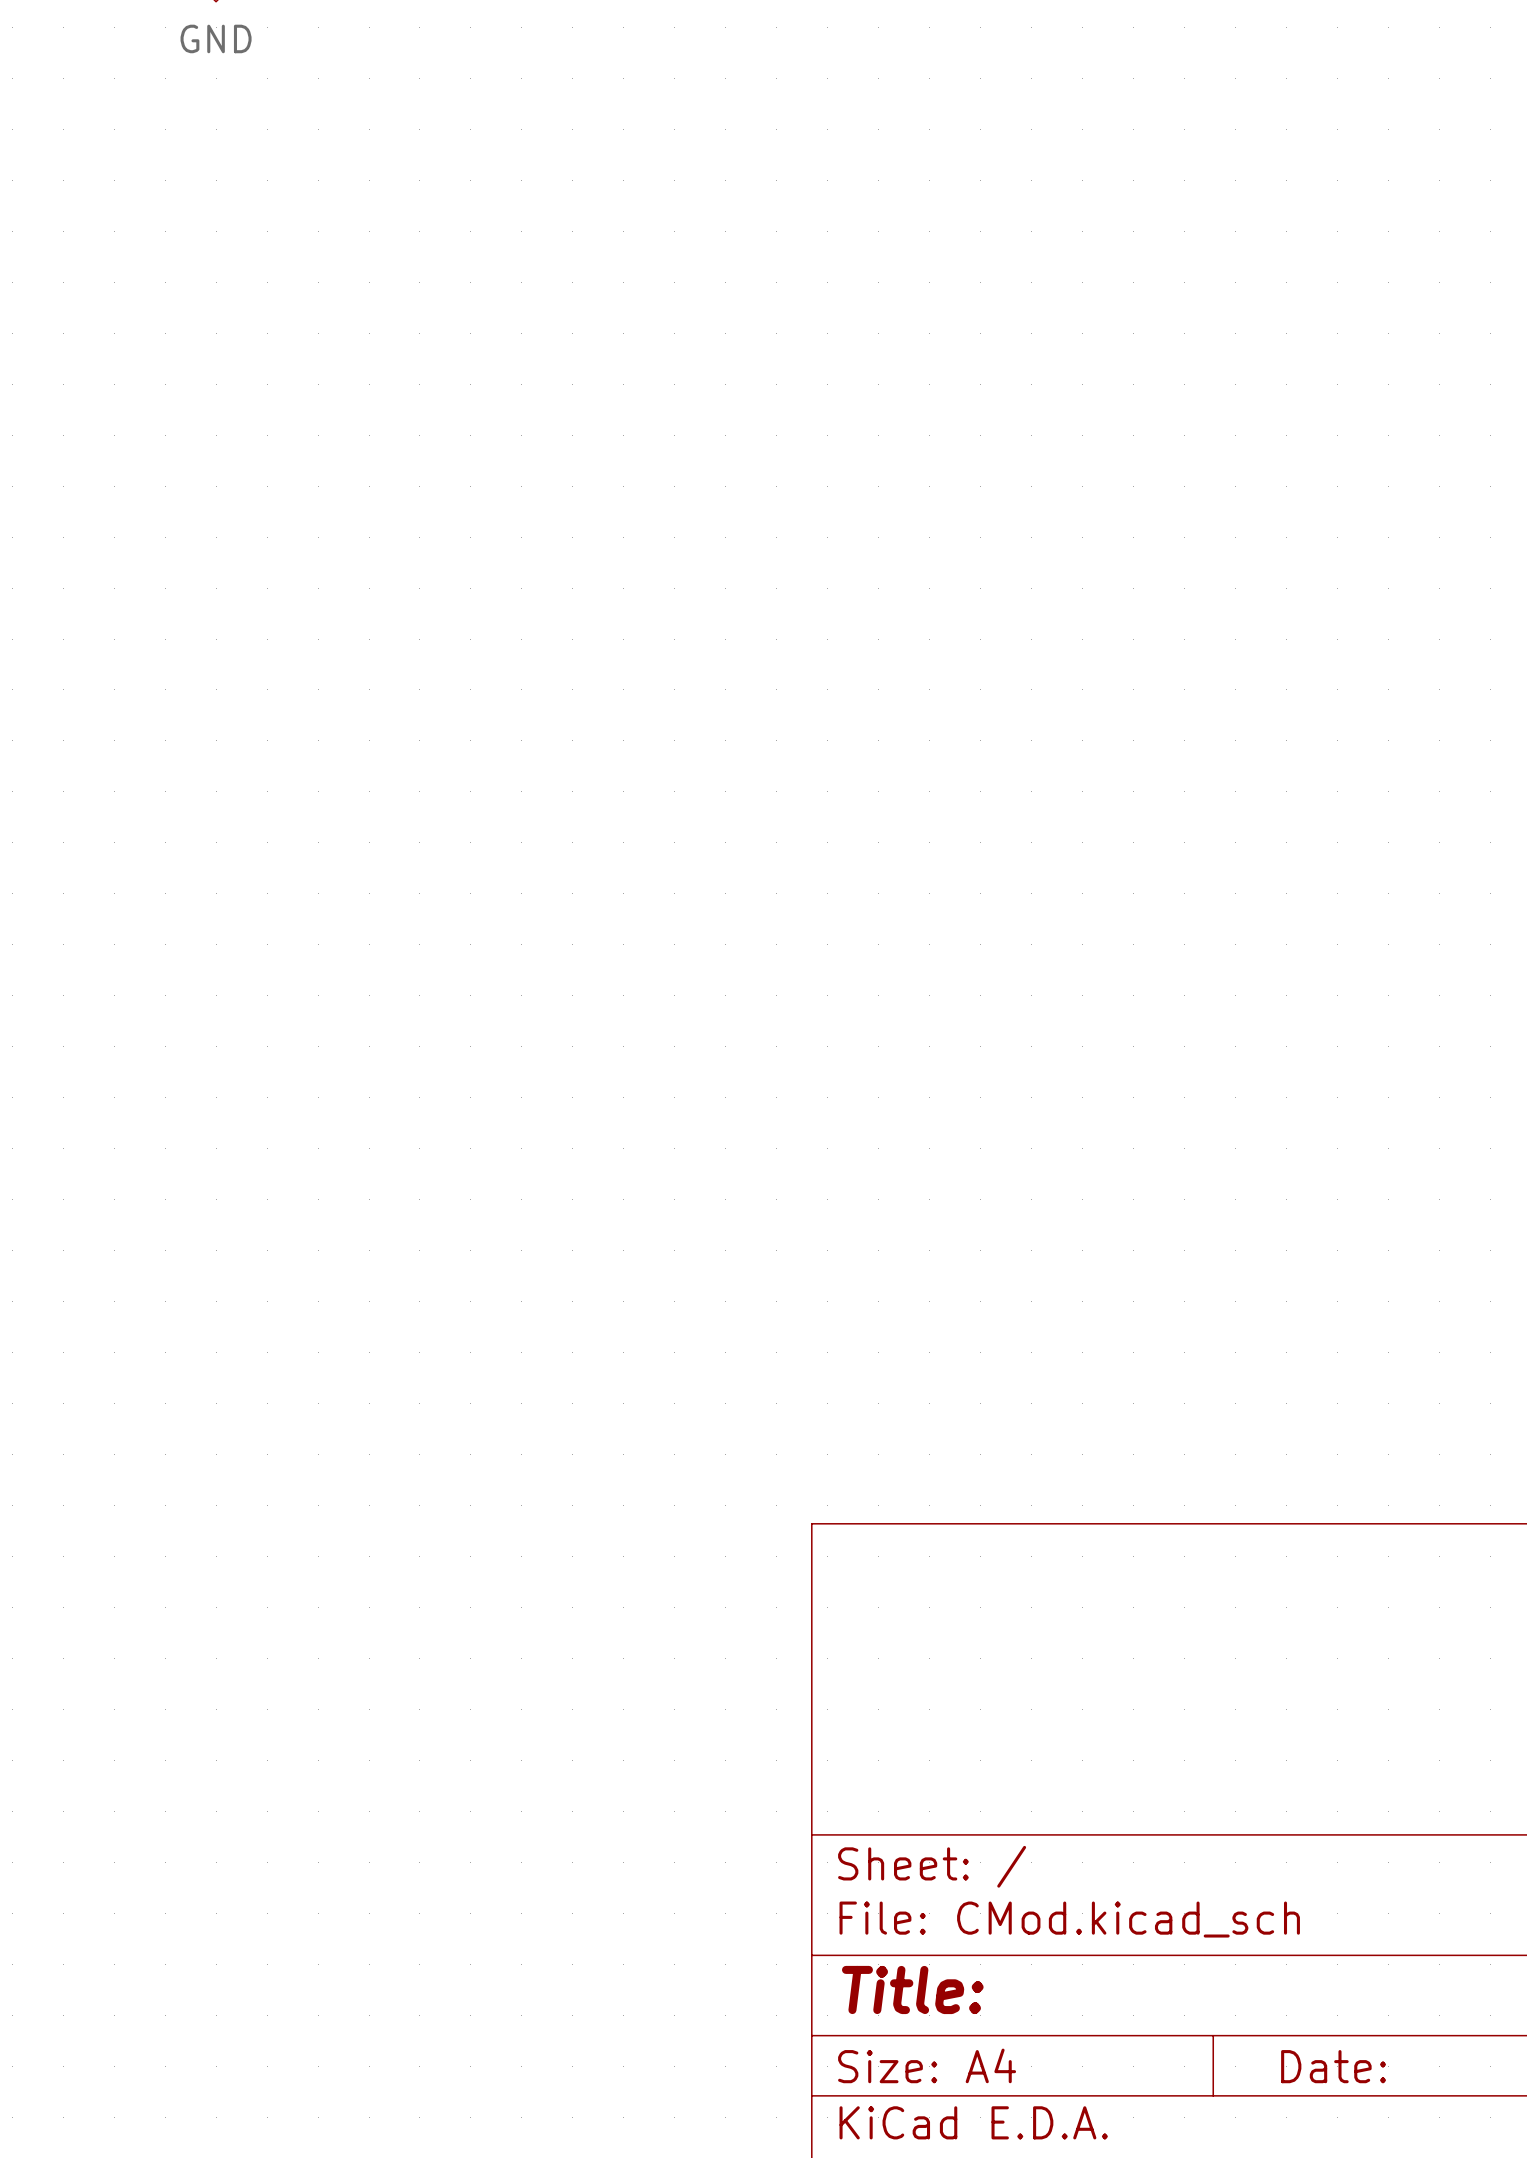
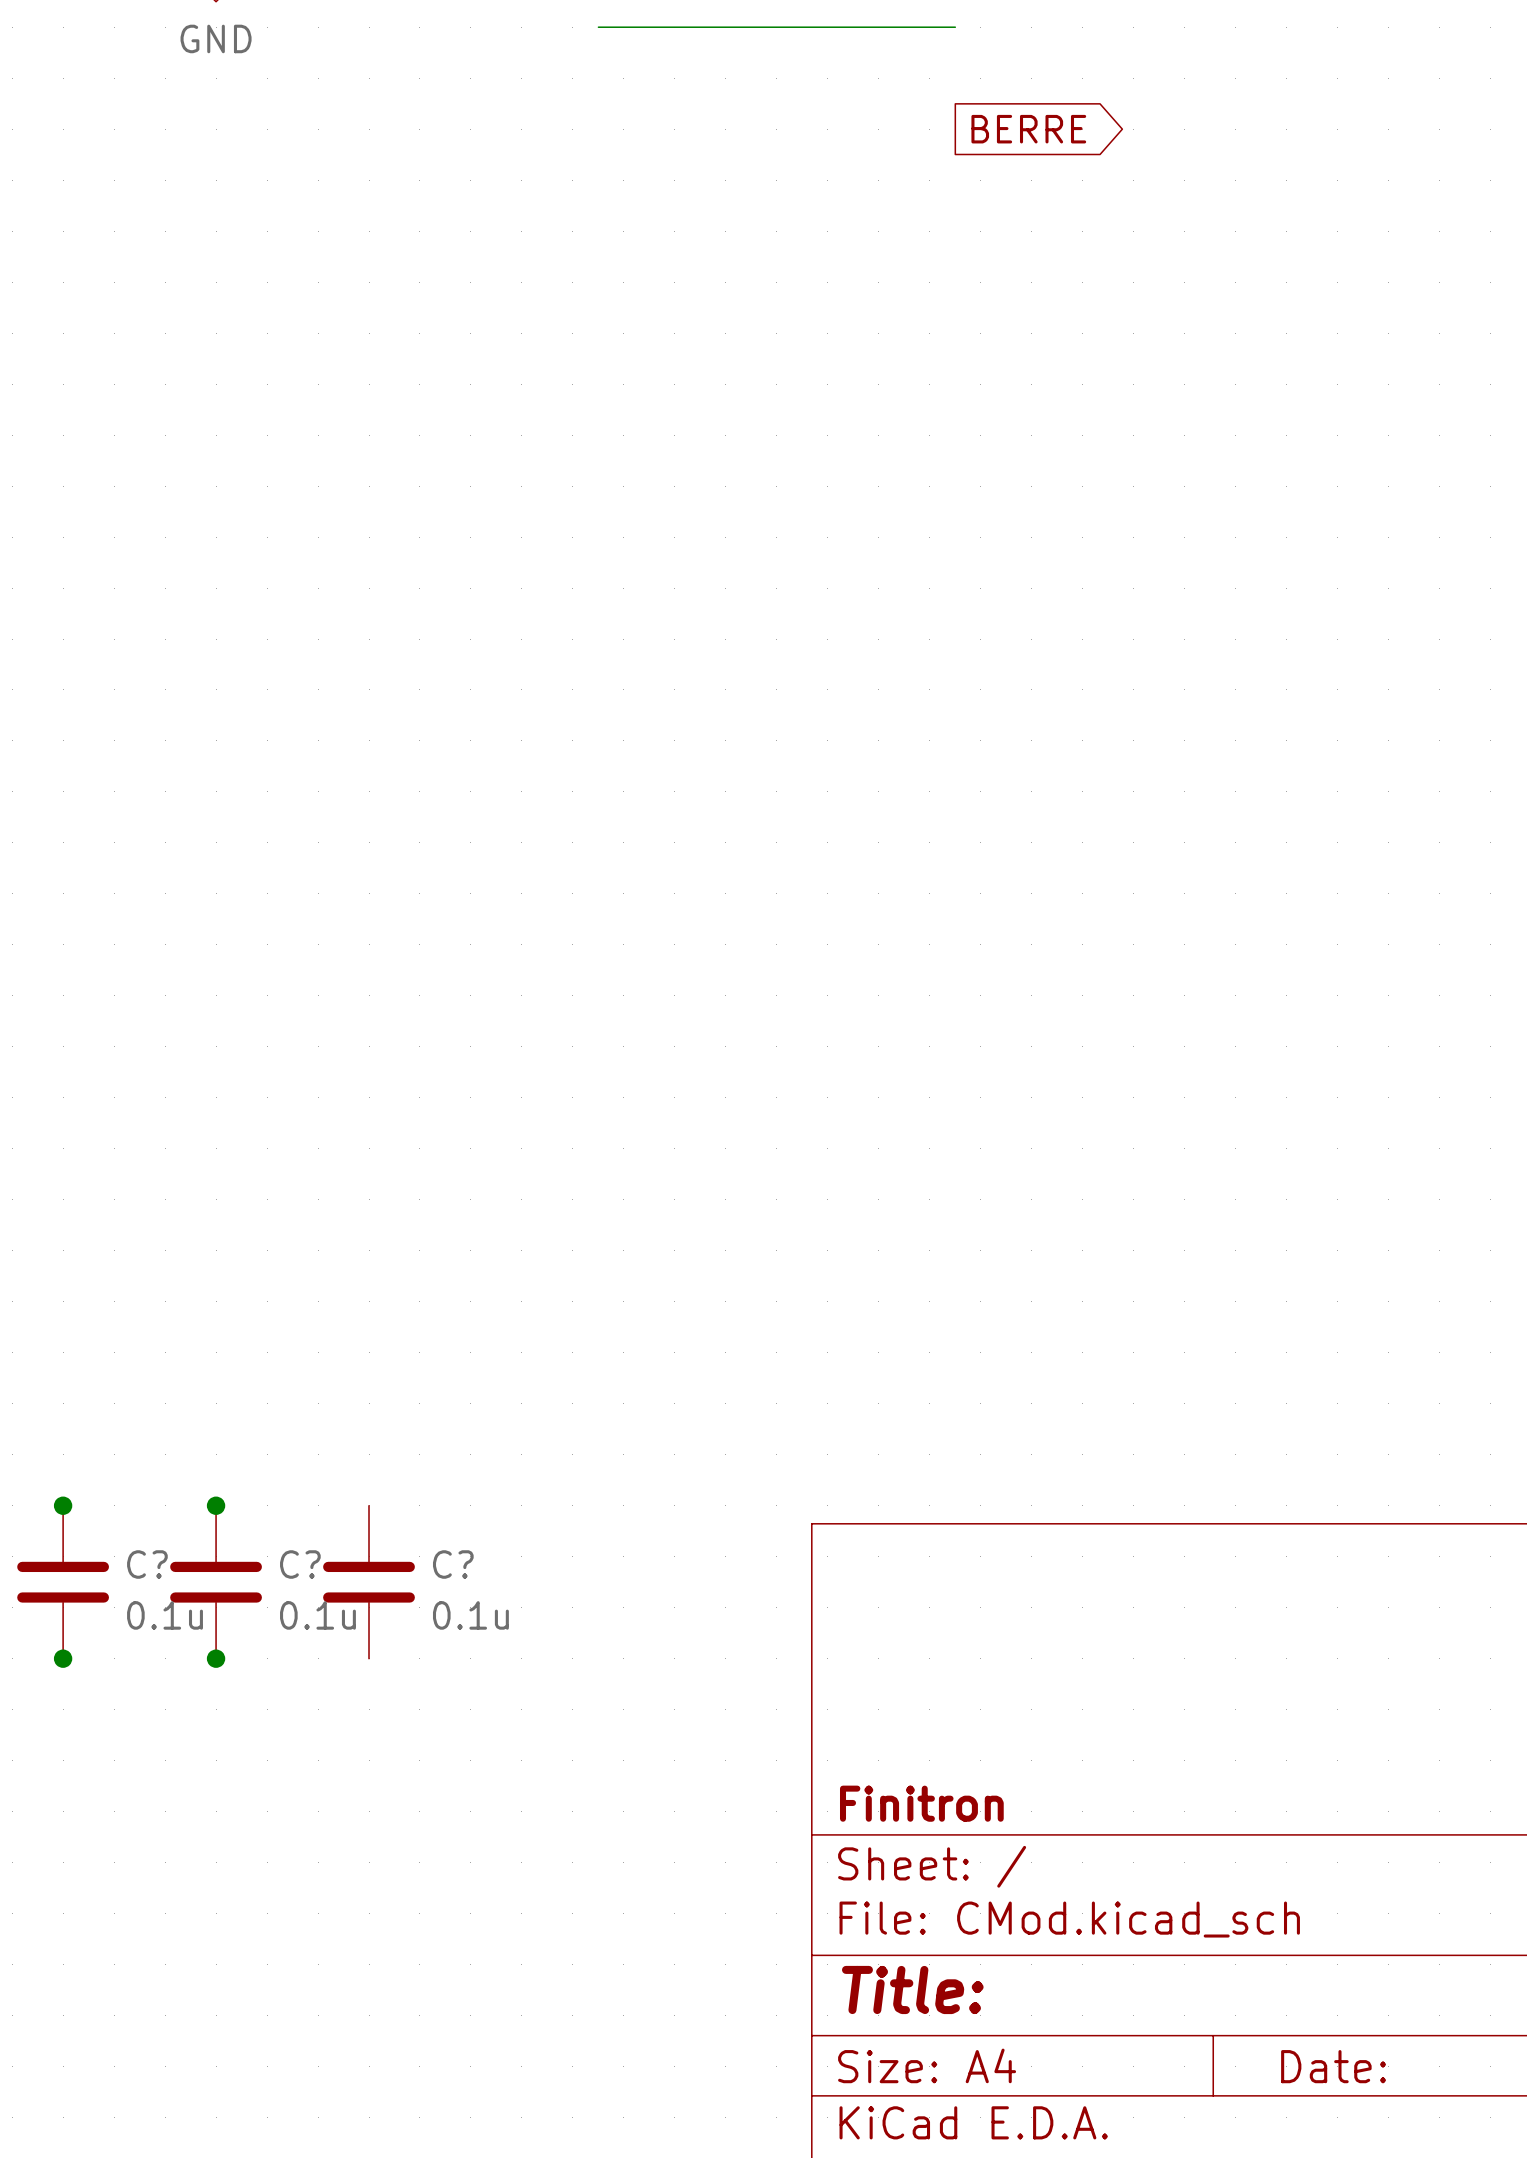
wire: none -> (598, 27) (955, 27)
global label: none -> BERRE (1028, 129)
junction: none -> (63, 1505)
junction: none -> (216, 1505)
C?: none -> 0.1u (63, 1582)
C?: none -> 0.1u (216, 1582)
C?: none -> 0.1u (369, 1582)
junction: none -> (63, 1658)
junction: none -> (216, 1658)
title block: none -> Finitron (921, 1803)

